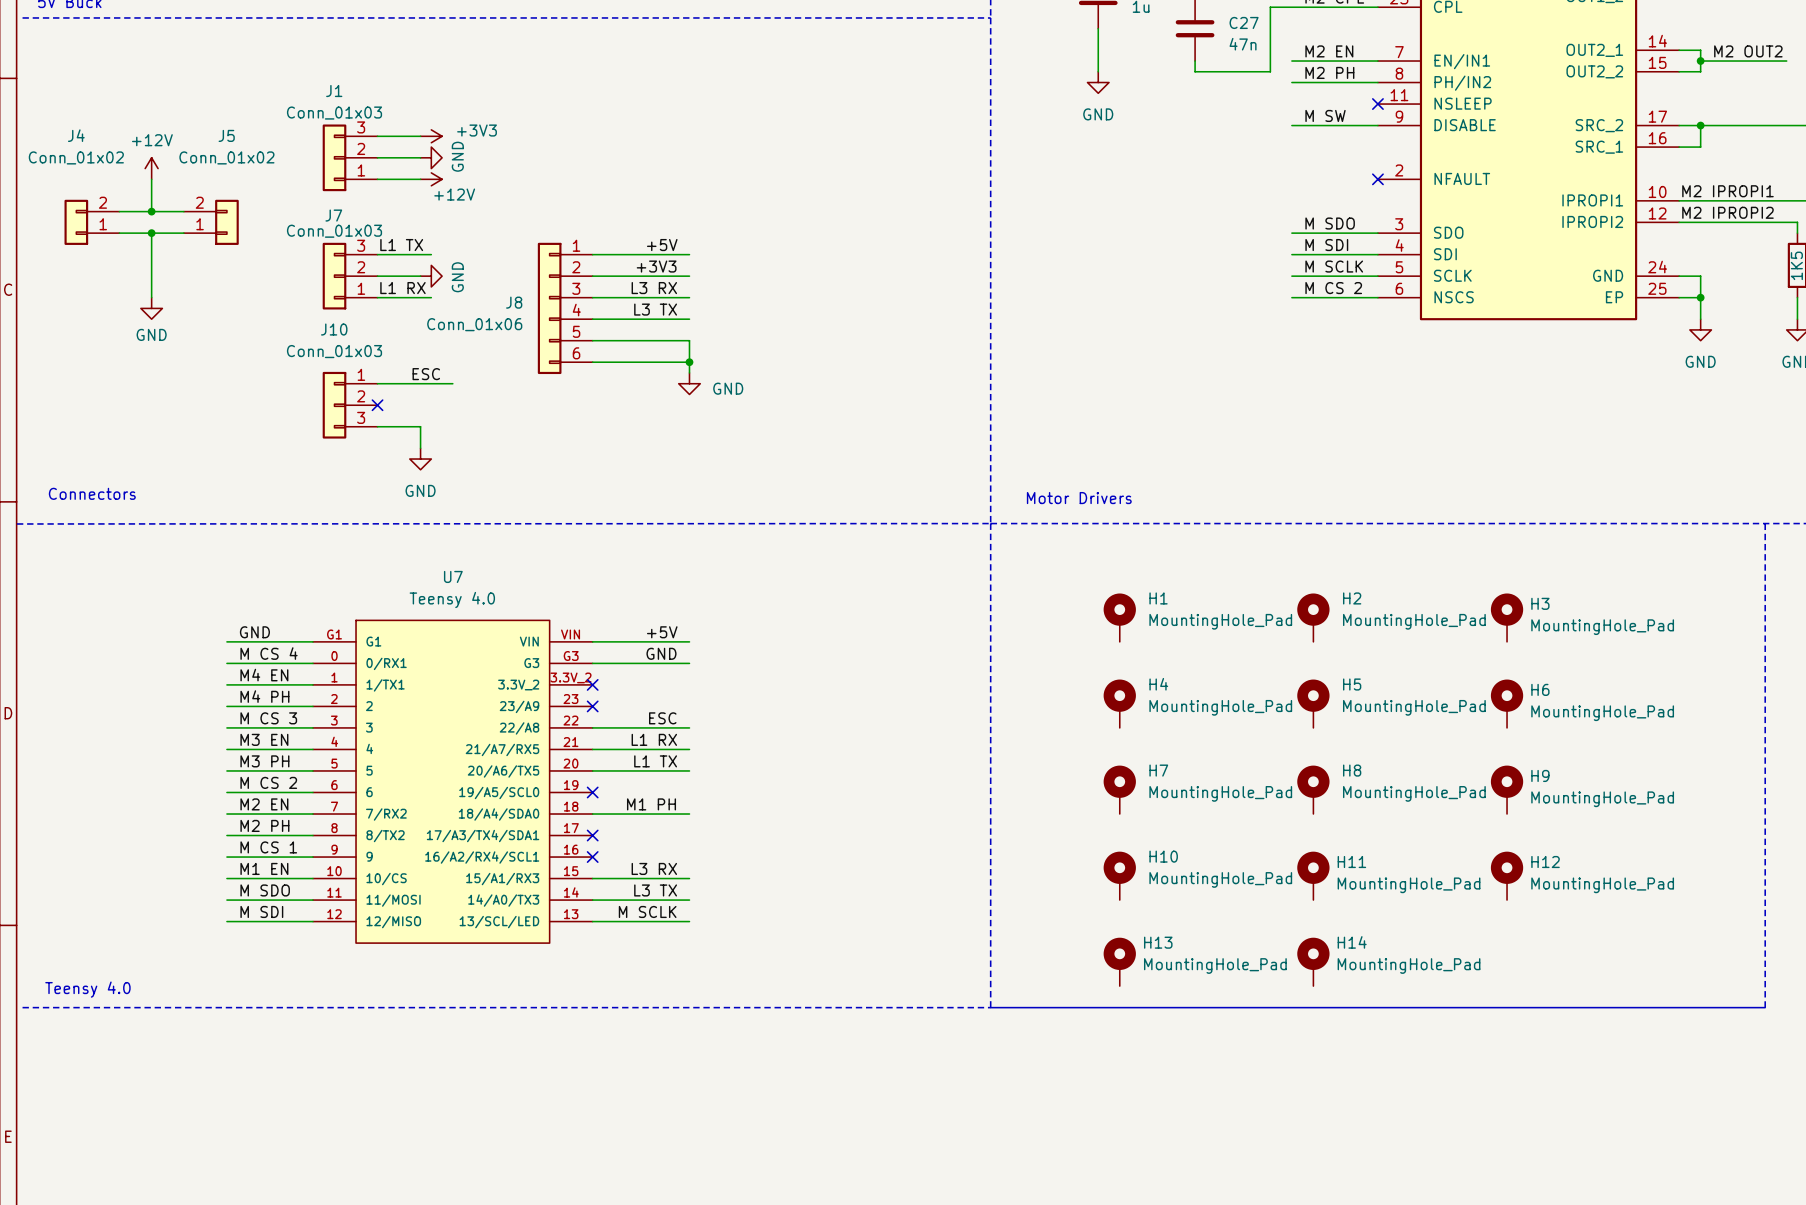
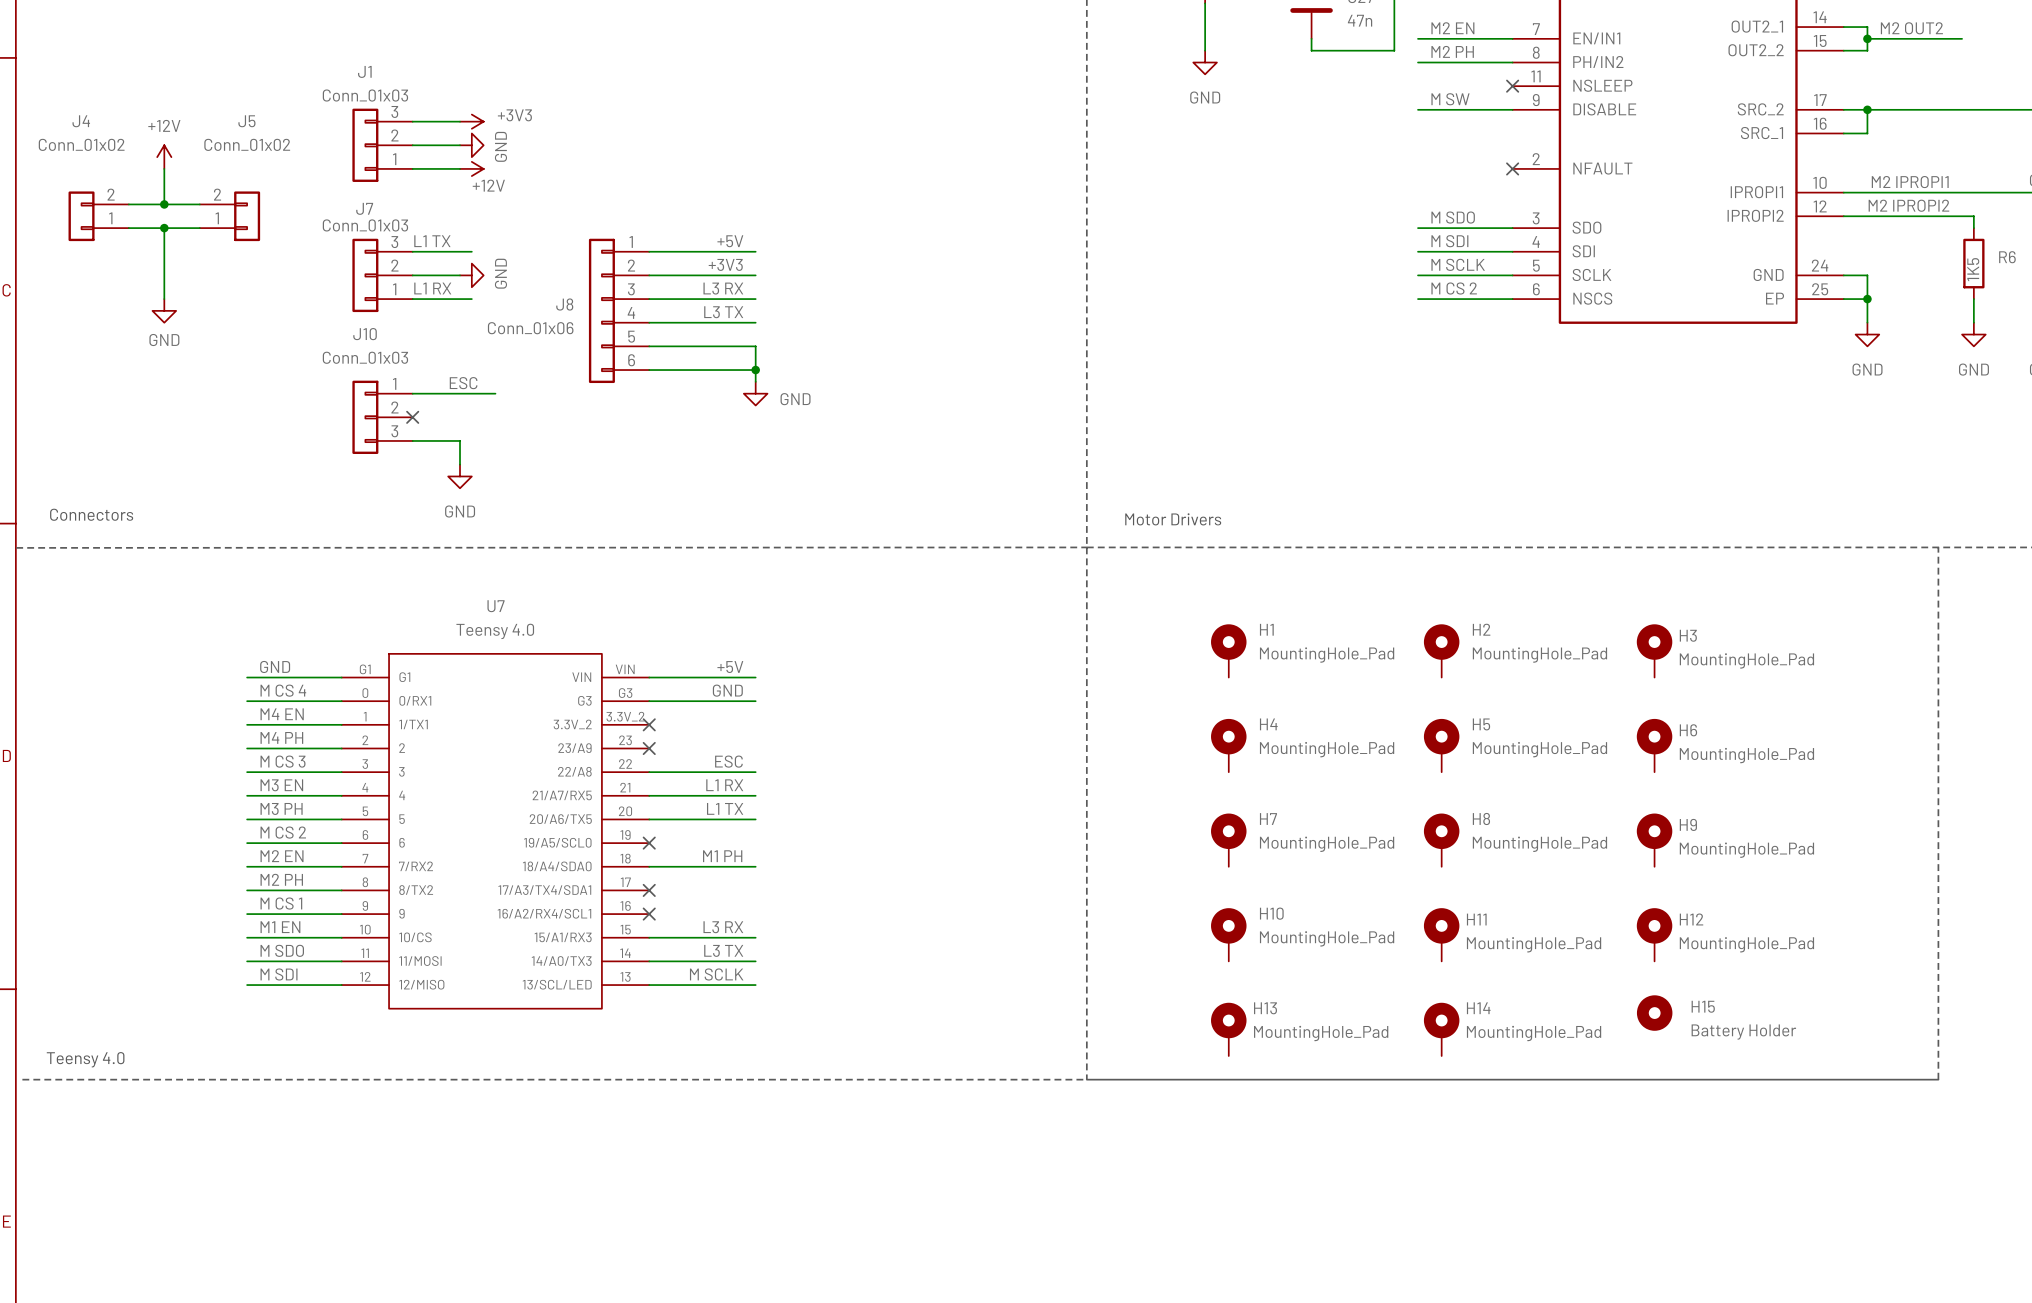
H15: none -> Battery Holder (1654, 1013)

